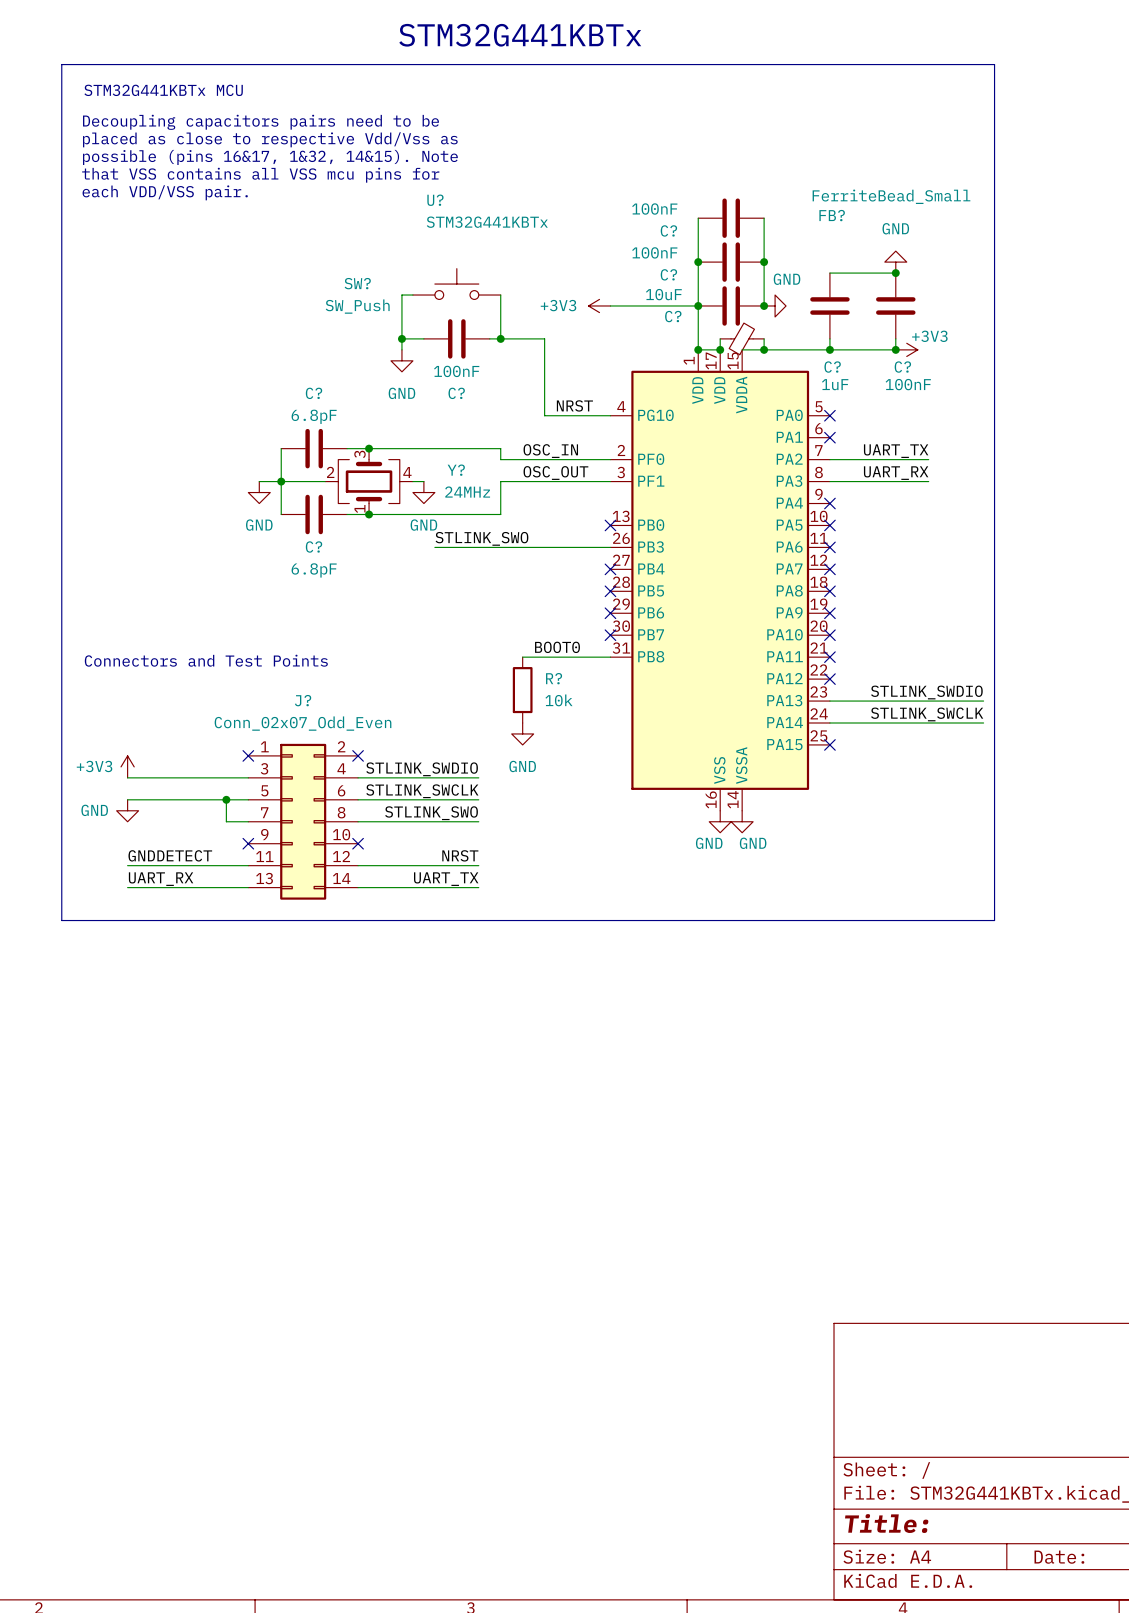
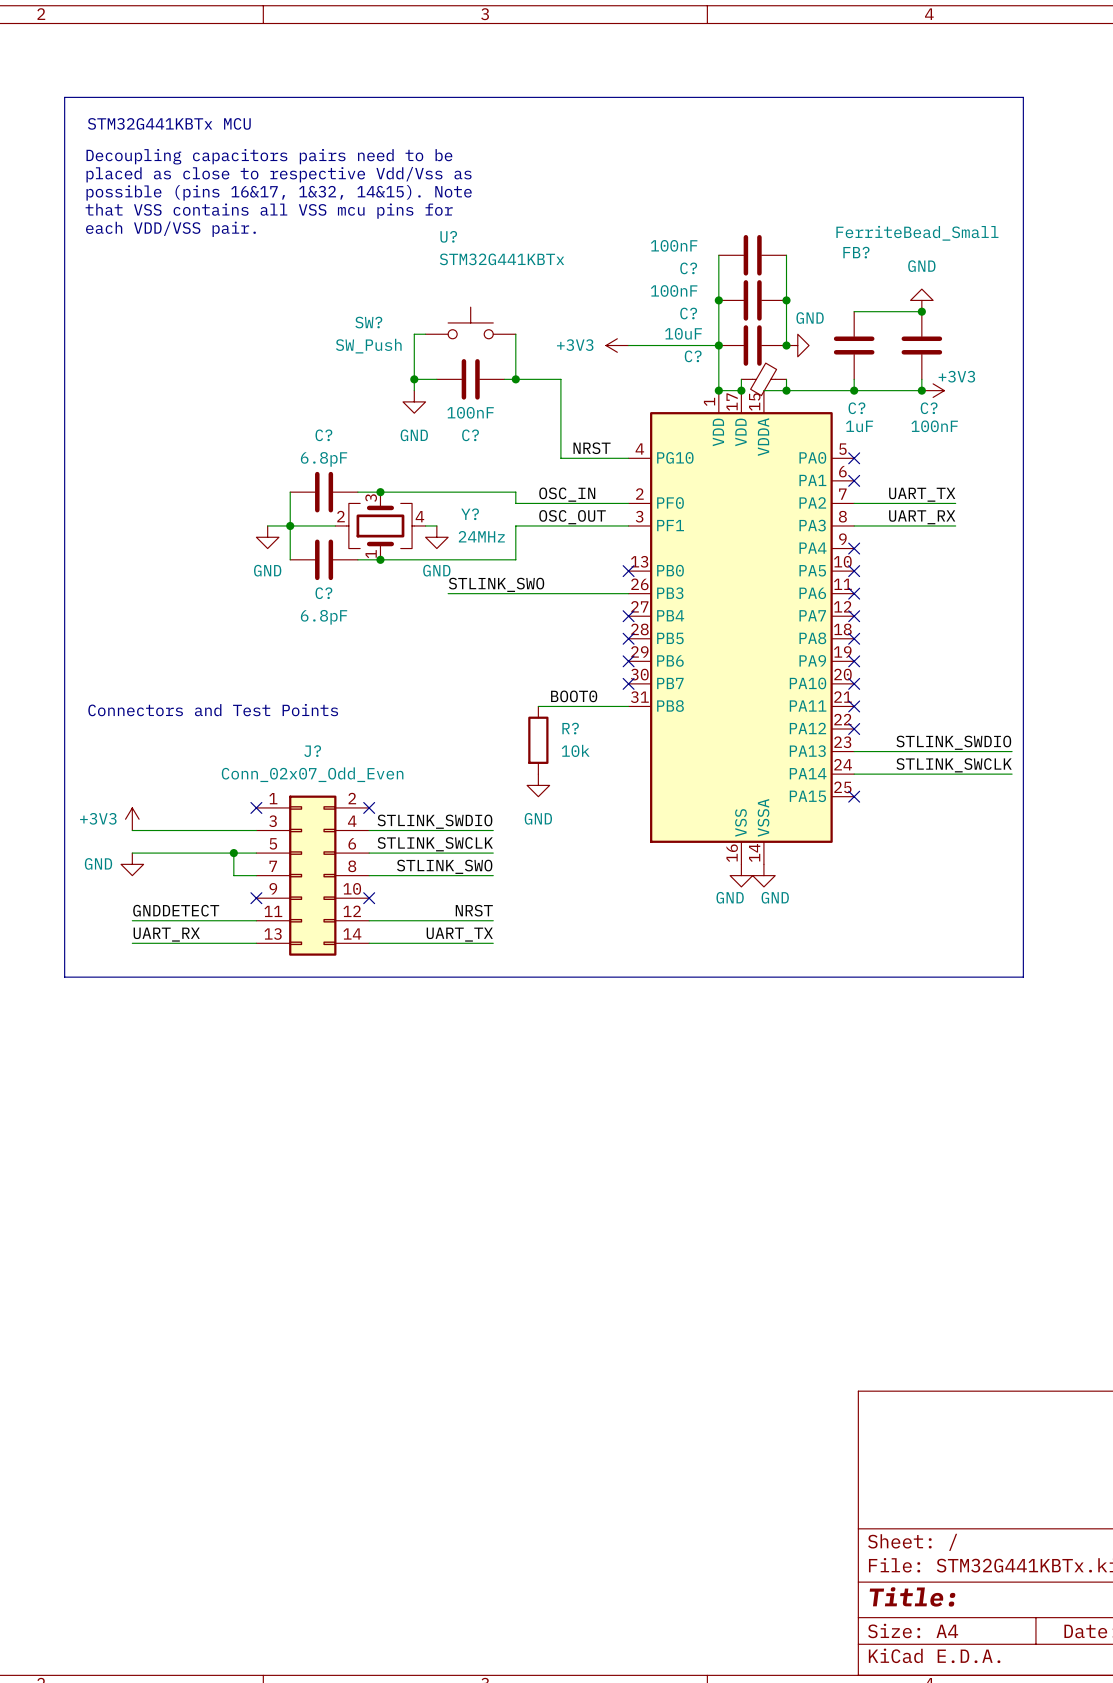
text: STM32G441KBTx (520, 35) -> none

